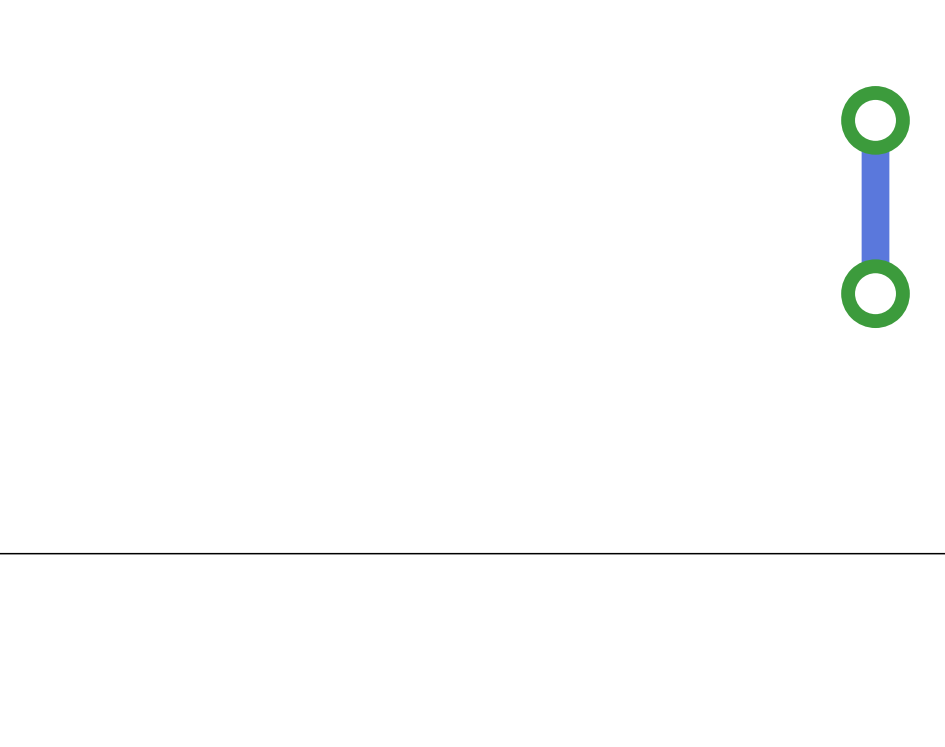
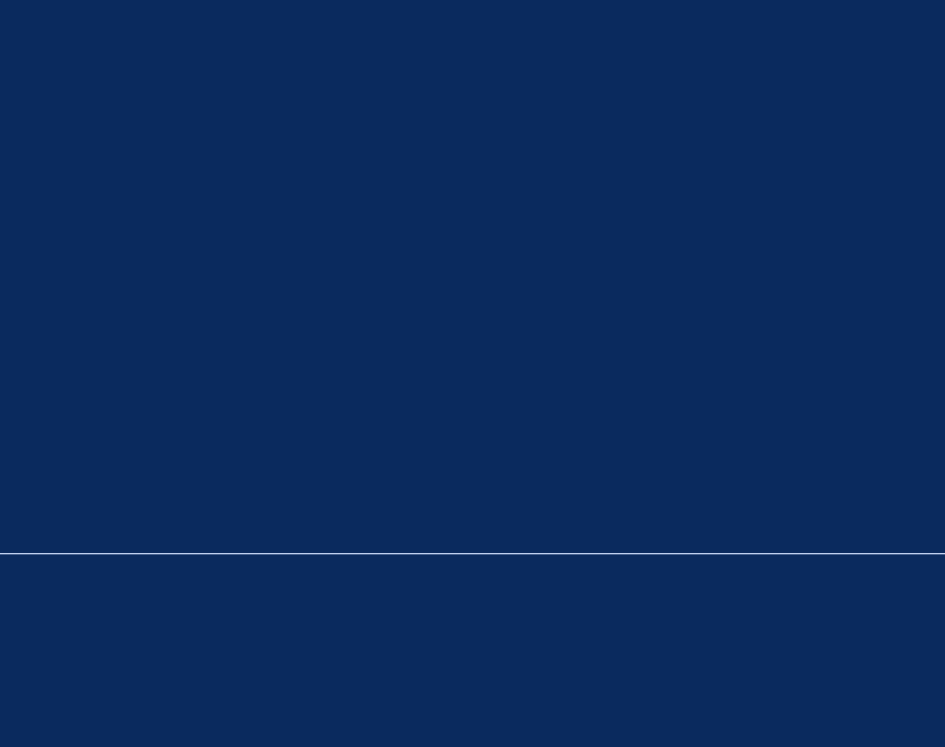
track: (875, 120) (875, 293) -> none
via: (875, 120) -> none
via: (875, 293) -> none

